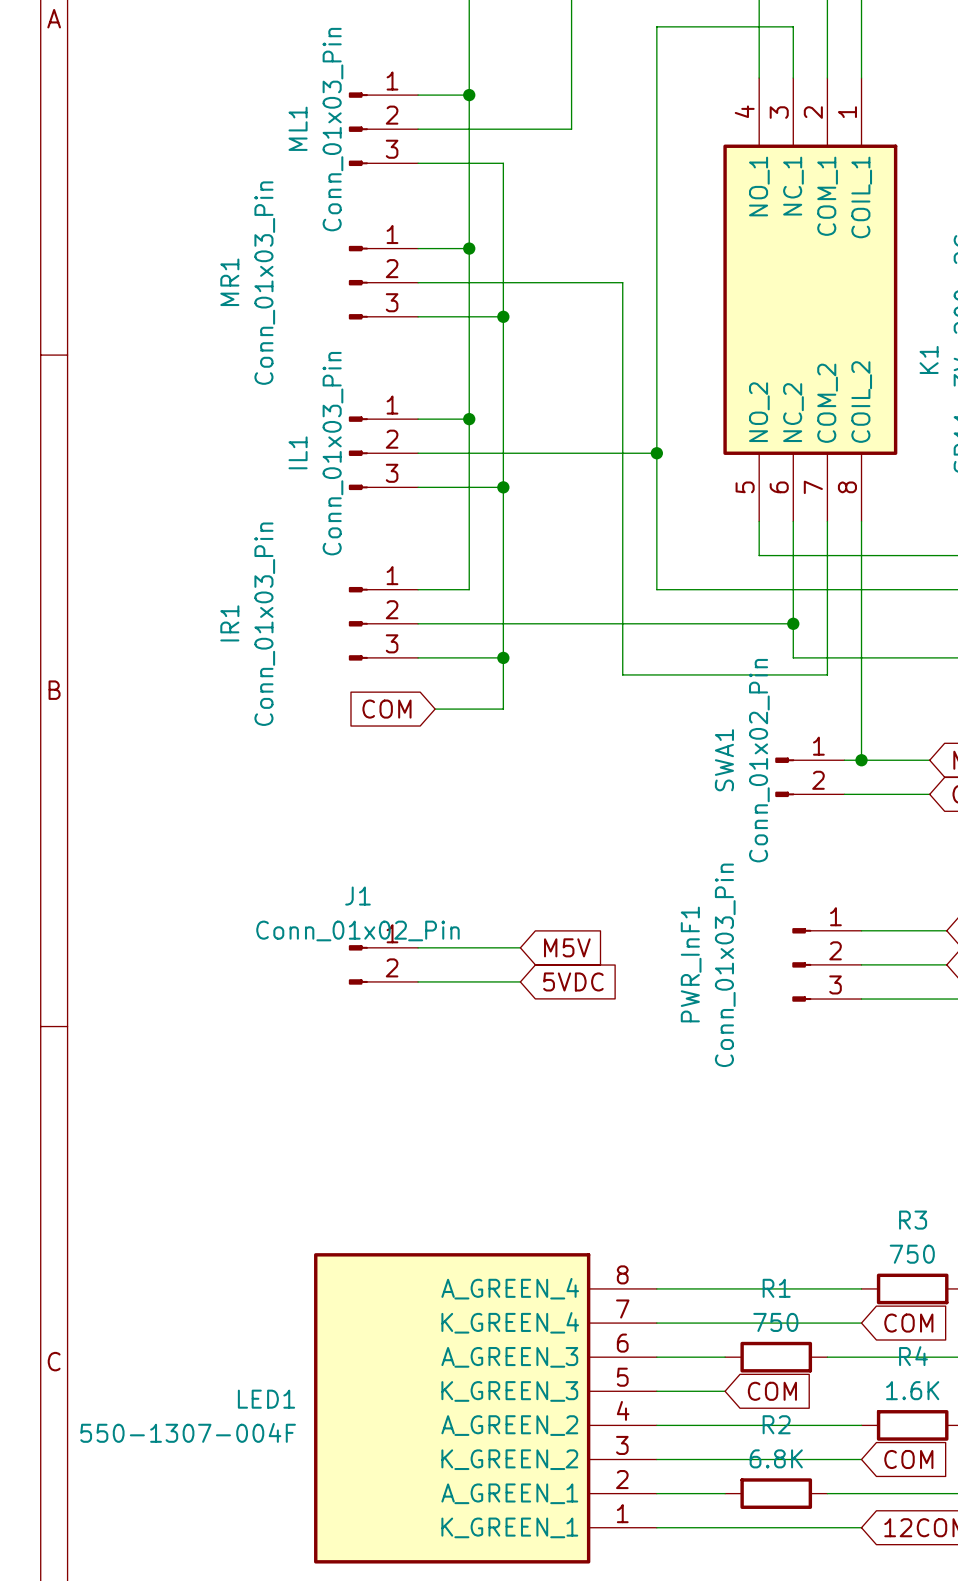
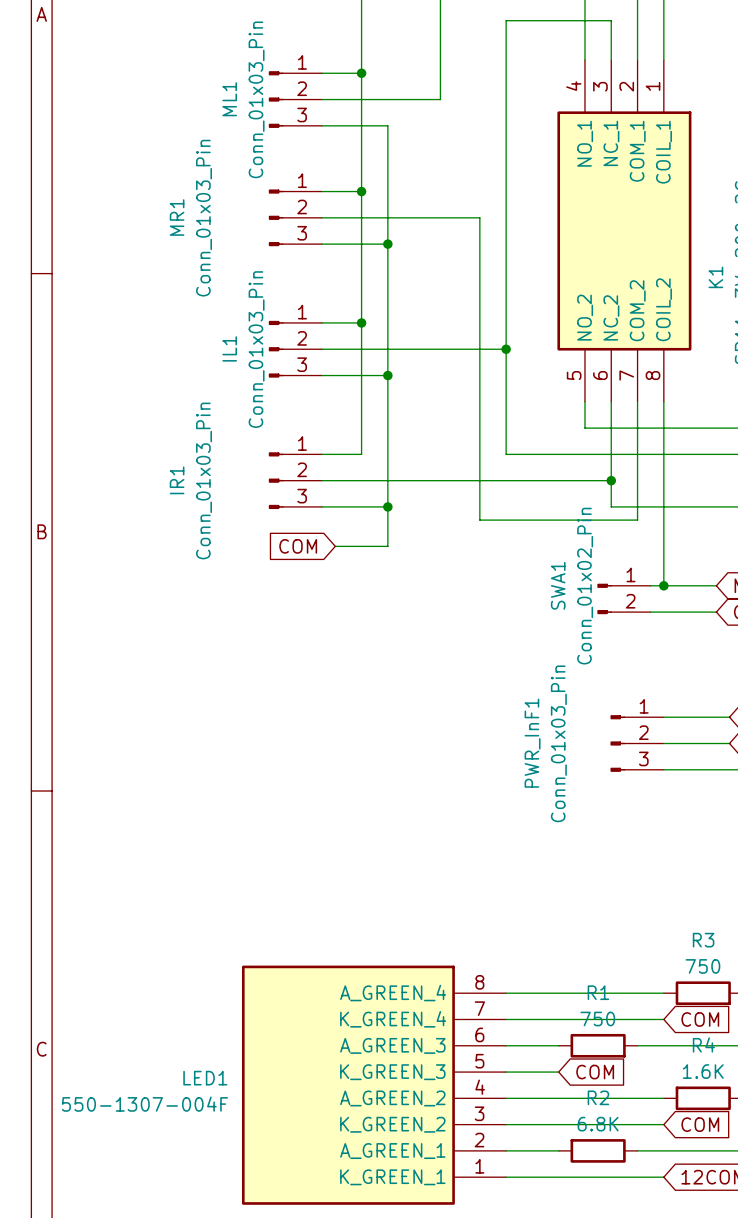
wire: (418, 947) (520, 947) -> none
global label: M5V (567, 947) -> none
J1: Conn_01x02_Pin (383, 964) -> none
wire: (418, 981) (520, 981) -> none
global label: 5VDC (573, 981) -> none

